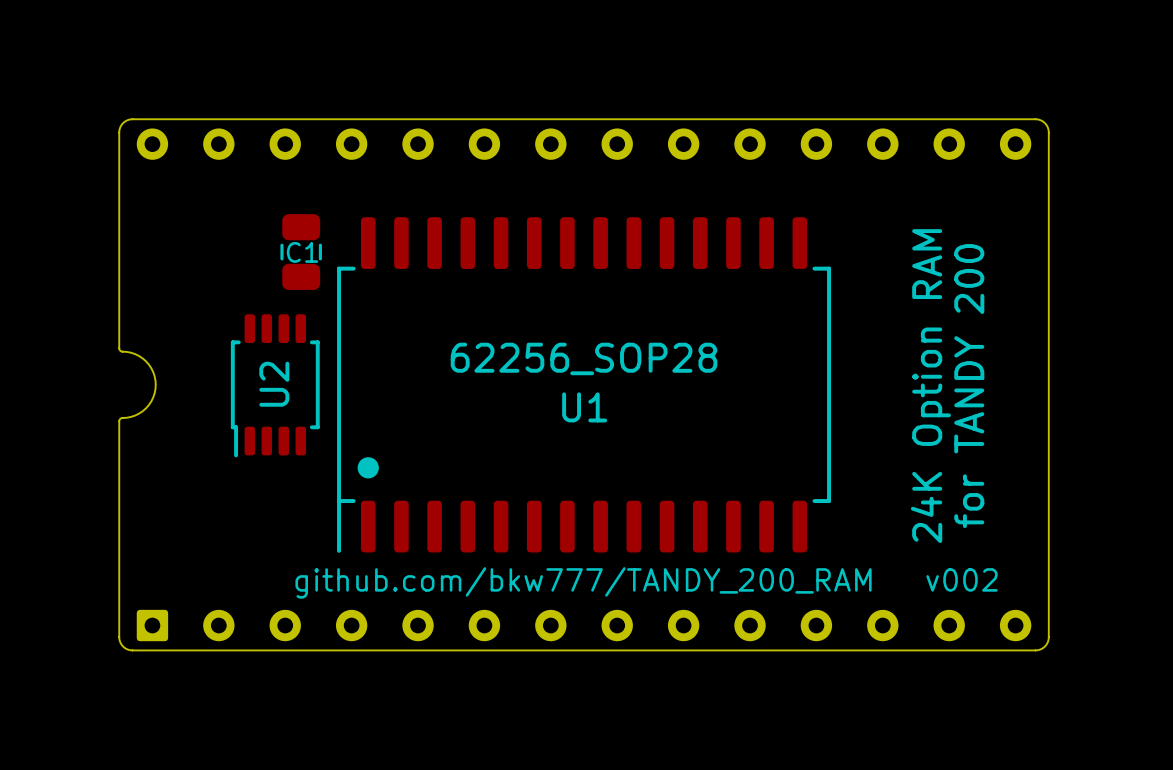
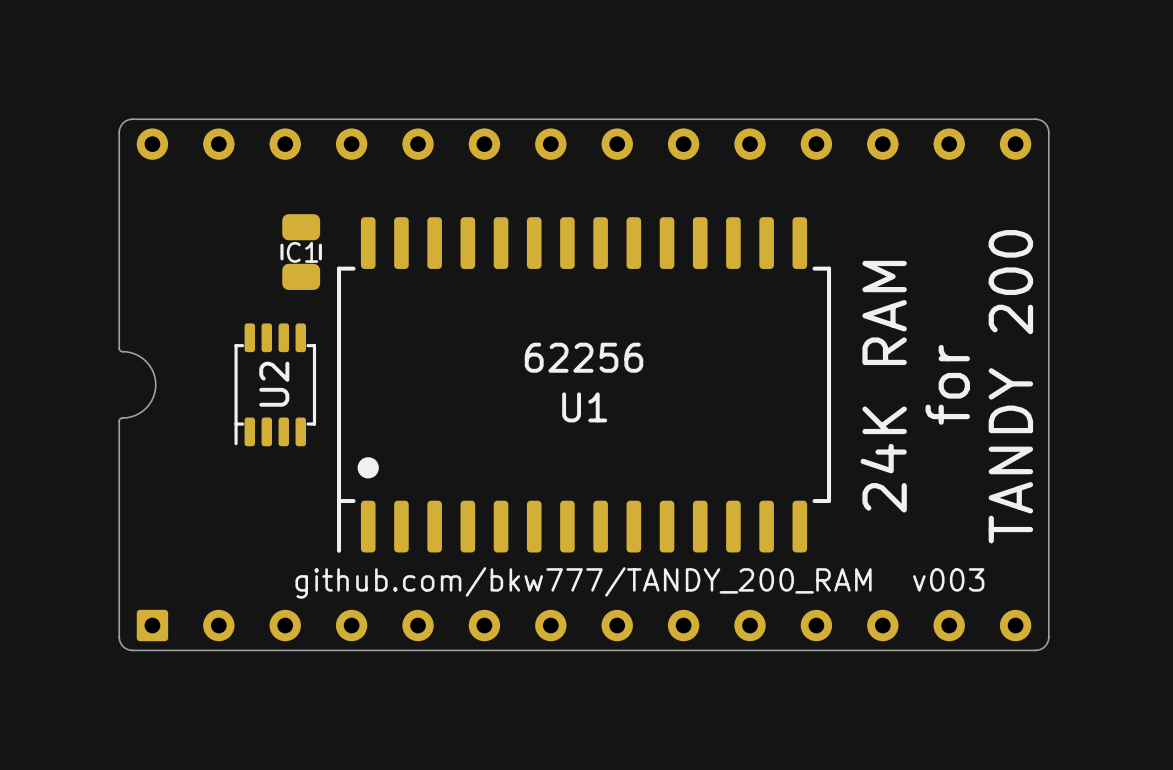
U2 footprint: [230, 314, 320, 458] -> [234, 323, 317, 447]
U1 value: 62256_SOP28 (584, 358) -> 62256 (584, 357)
text: none -> for (947, 384)
text: 24K Option RAM (930, 386) -> 24K RAM (883, 386)
text: for TANDY 200 (969, 386) -> TANDY 200 (1010, 386)
text: v002 (961, 579) -> v003 (948, 579)

